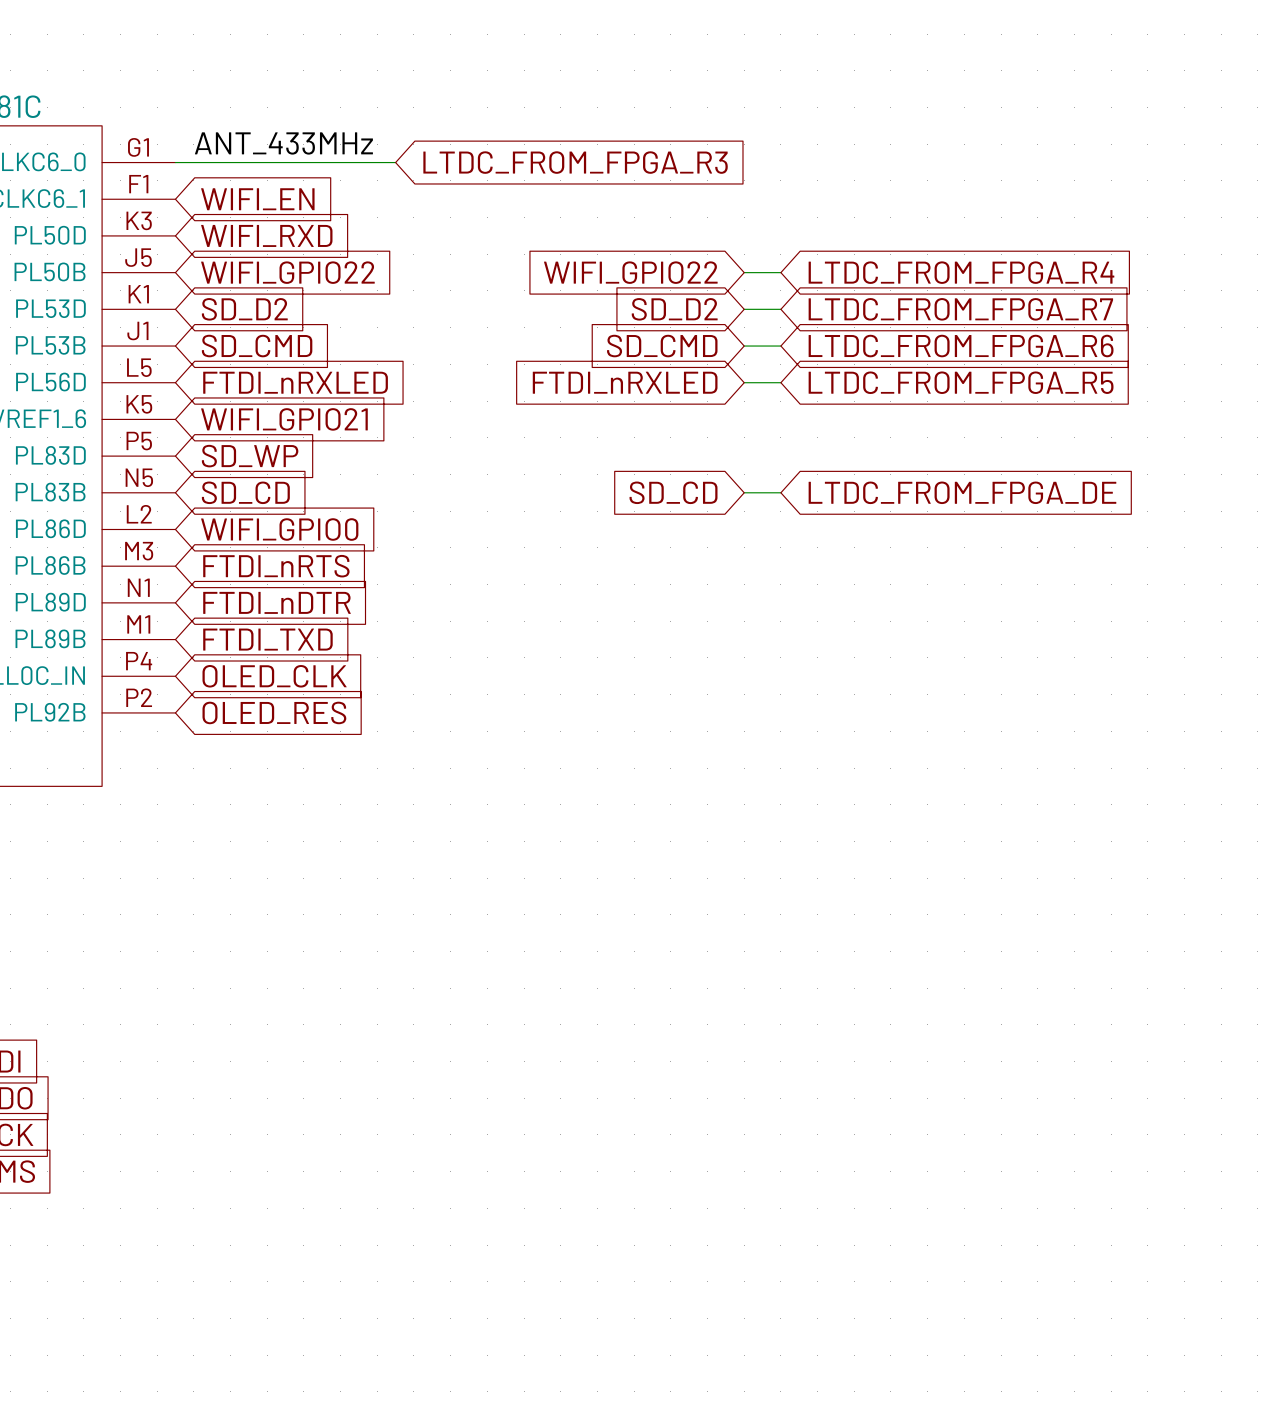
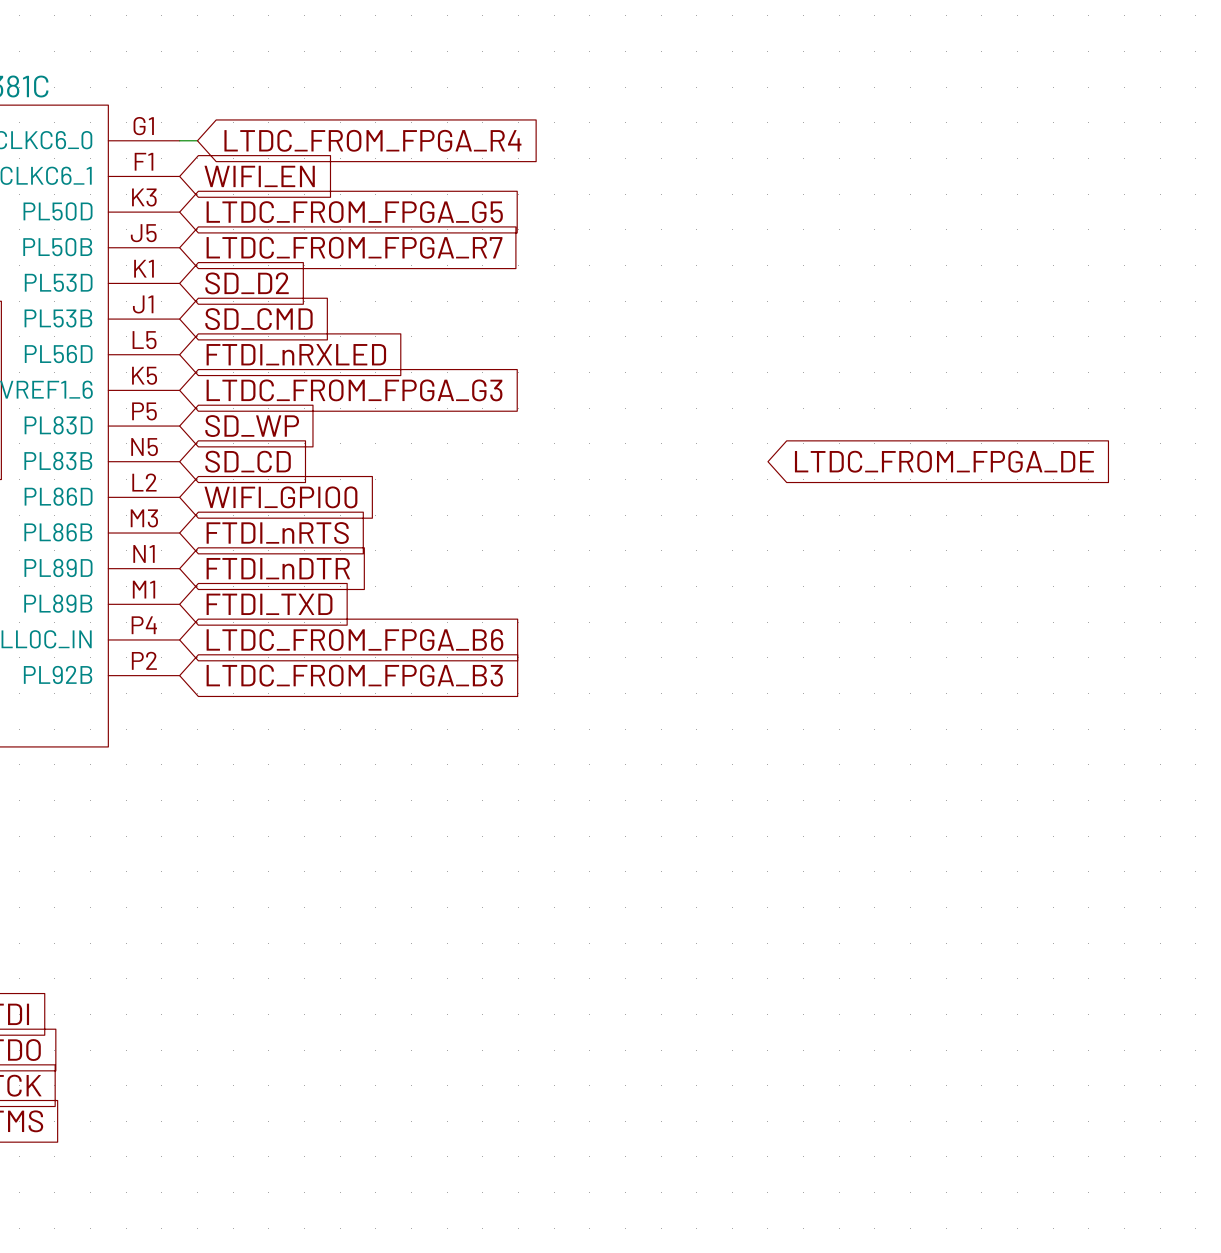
label: ANT_433MHz (283, 143) -> none
wire: (193, 162) (395, 162) -> none
global label: LTDC_FROM_FPGA_R3 (575, 162) -> LTDC_FROM_FPGA_R4 (372, 140)
global label: WIFI_RXD (266, 235) -> LTDC_FROM_FPGA_G5 (354, 212)
global label: WIFI_GPIO22 (287, 272) -> LTDC_FROM_FPGA_R7 (354, 247)
global label: WIFI_GPIO22 (630, 272) -> none
wire: (744, 272) (780, 272) -> none
global label: LTDC_FROM_FPGA_R4 (961, 272) -> none
global label: SD_D2 (674, 309) -> none
wire: (744, 309) (780, 309) -> none
global label: LTDC_FROM_FPGA_R7 (960, 309) -> none
global label: SD_CMD (662, 346) -> none
wire: (744, 346) (780, 346) -> none
global label: LTDC_FROM_FPGA_R6 (961, 346) -> none
global label: FTDI_nRXLED (625, 382) -> none
wire: (744, 382) (780, 382) -> none
global label: LTDC_FROM_FPGA_R5 (961, 382) -> none
global label: WIFI_GPIO21 (284, 419) -> LTDC_FROM_FPGA_G3 (354, 390)
global label: SD_CD (673, 492) -> none
wire: (744, 492) (780, 492) -> none
global label: OLED_CLK (274, 676) -> LTDC_FROM_FPGA_B6 (354, 639)
global label: OLED_RES (274, 712) -> LTDC_FROM_FPGA_B3 (354, 675)

